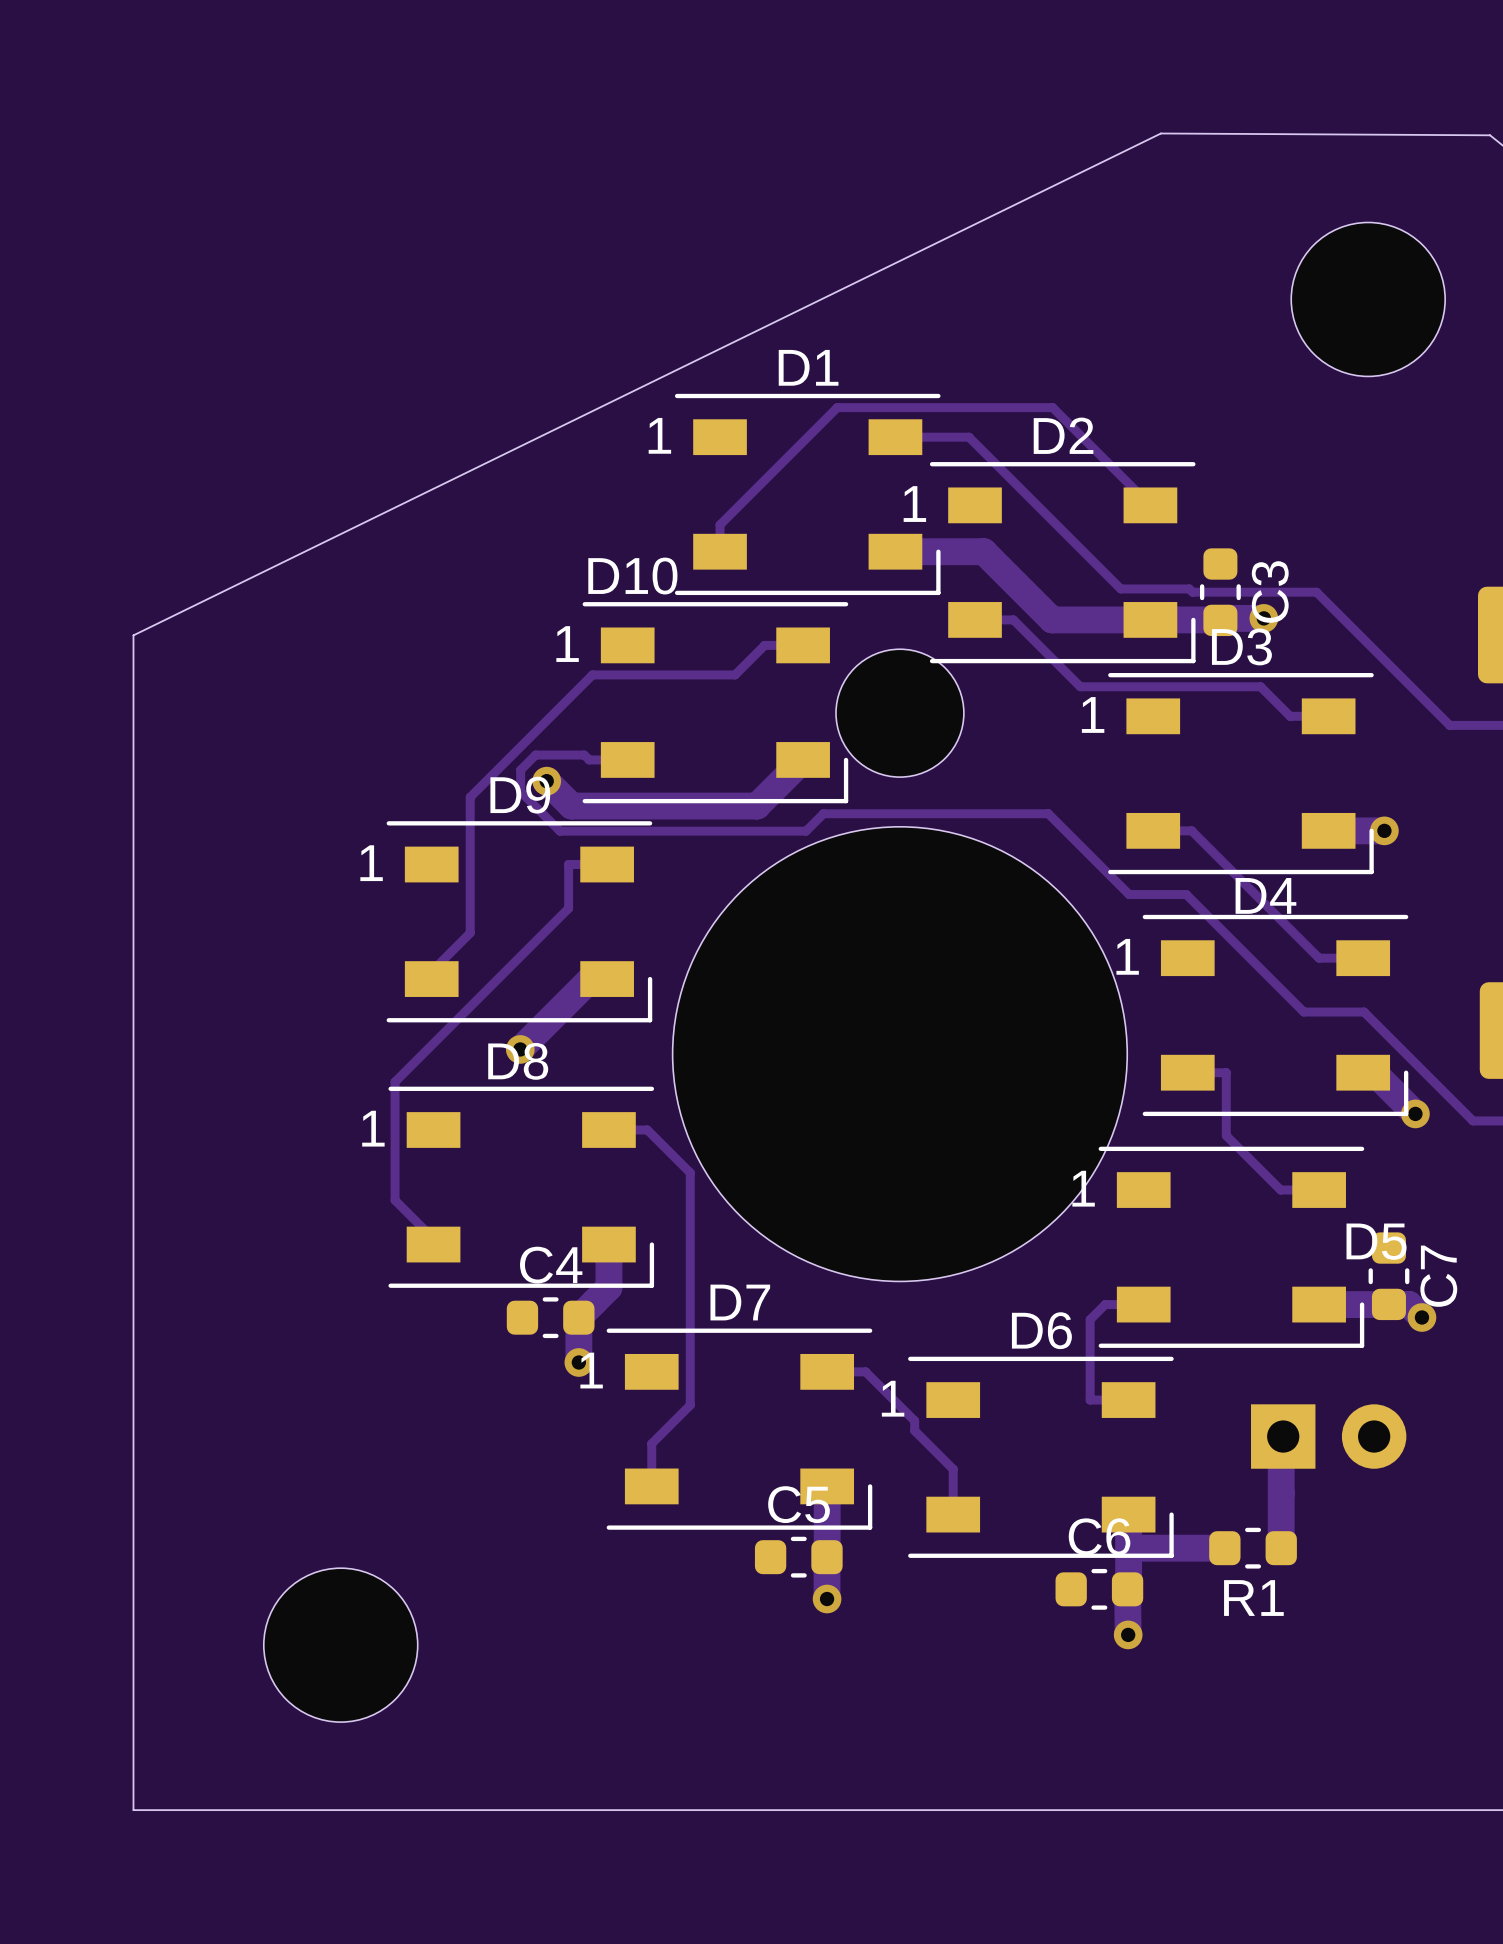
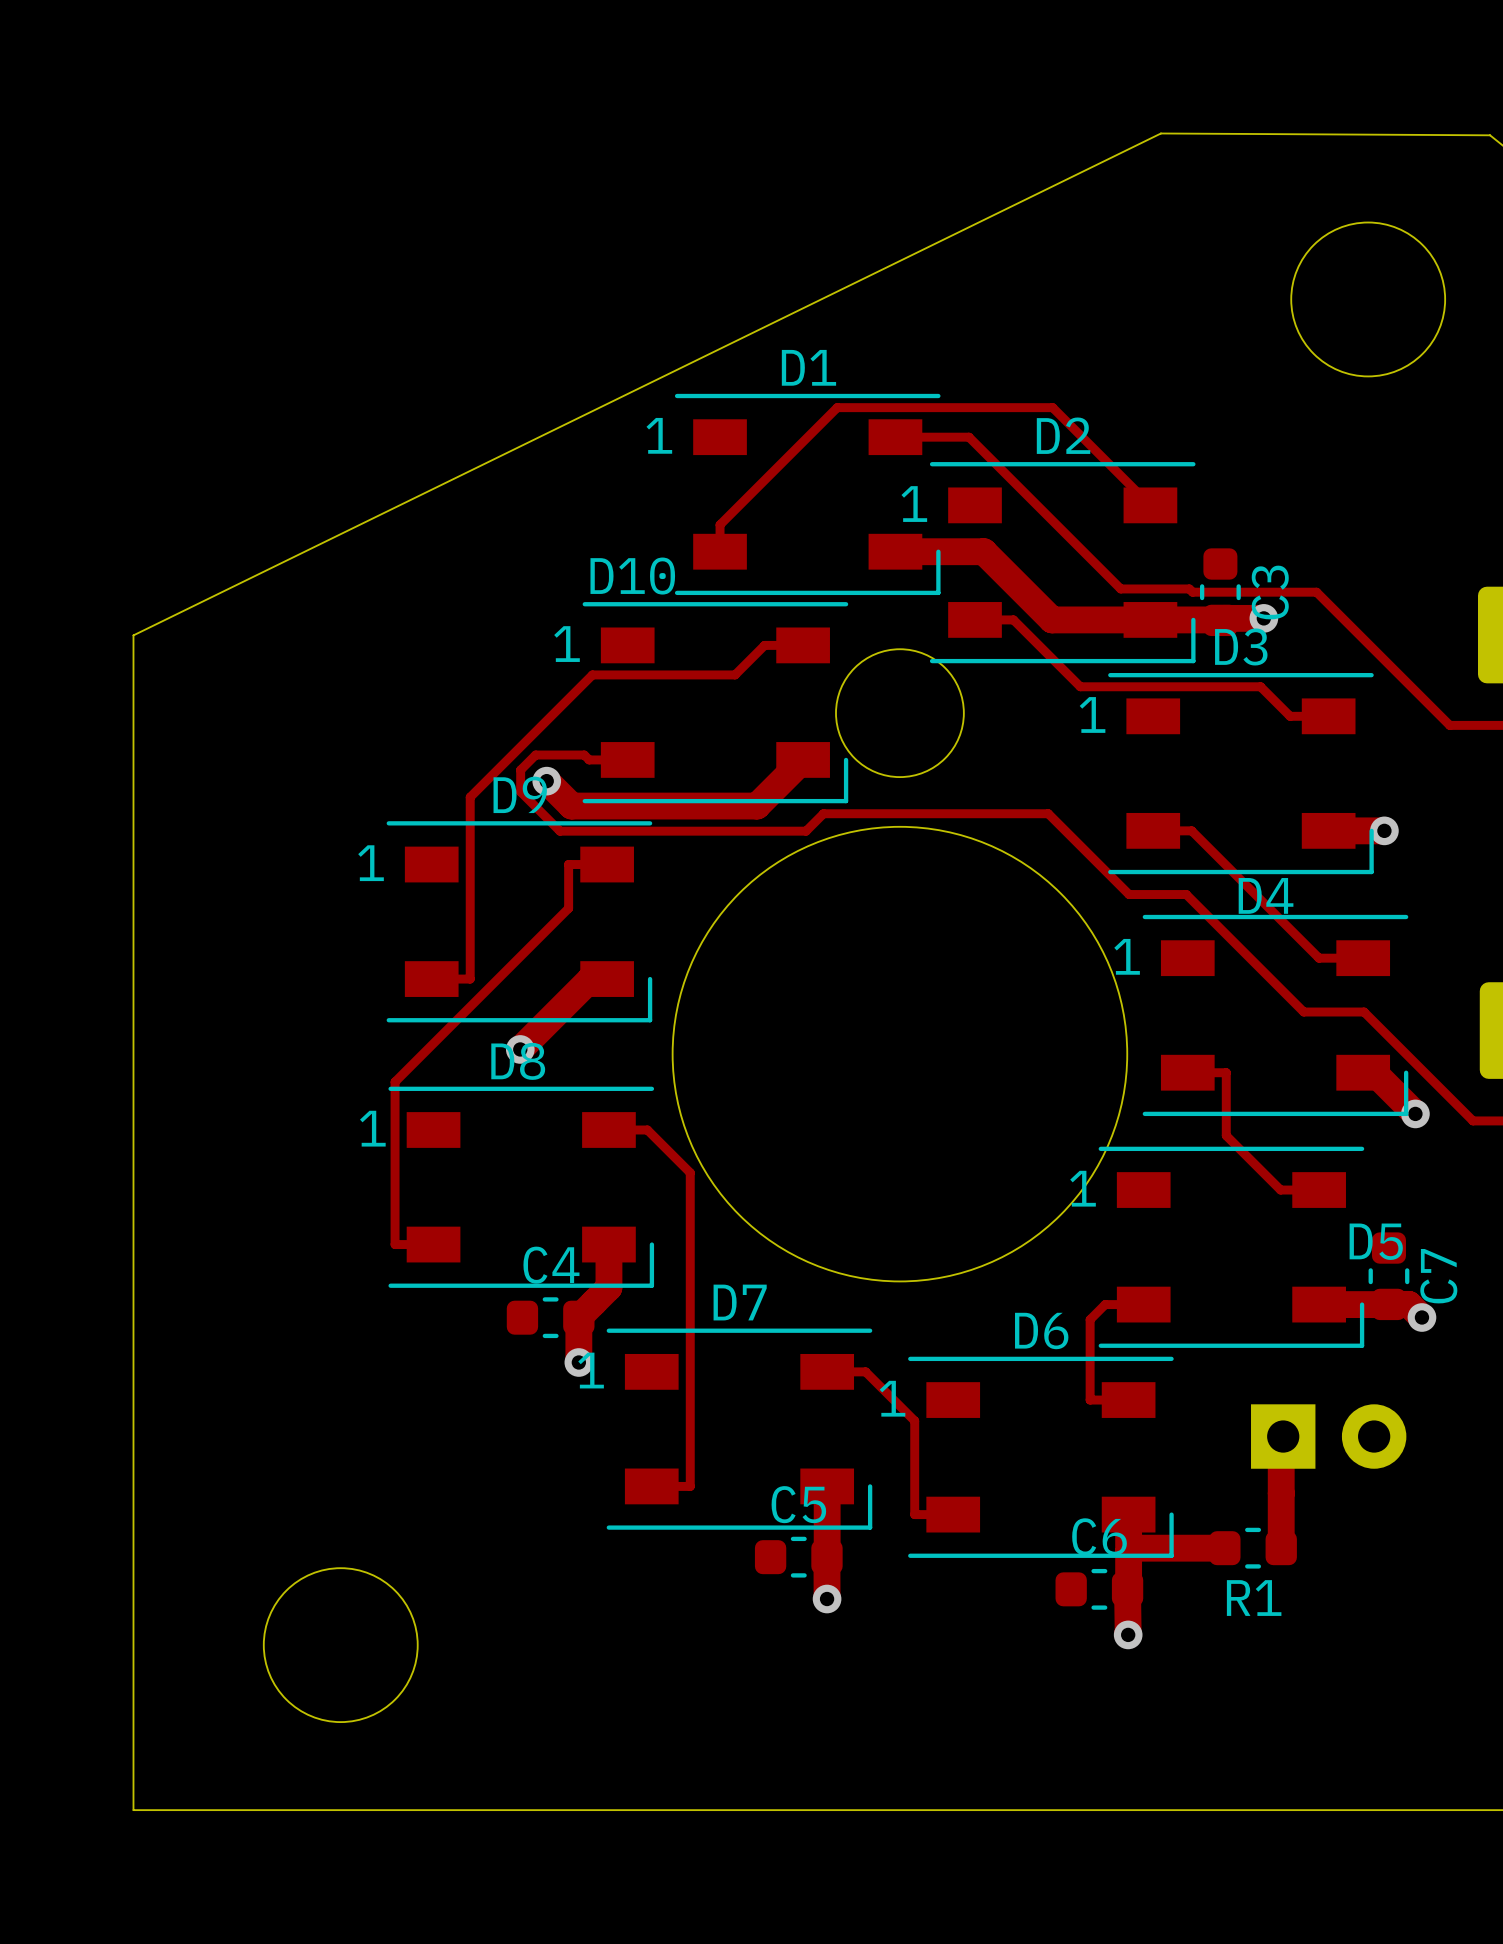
track: (470, 933) (431, 971) (431, 979) -> (470, 933) (470, 979) (431, 979)
track: (395, 1200) (433, 1238) (433, 1244) -> (395, 1200) (395, 1244) (433, 1244)
track: (690, 1405) (651, 1443) (651, 1486) -> (690, 1405) (690, 1486) (651, 1486)
track: (914, 1430) (953, 1469) (953, 1514) -> (914, 1430) (914, 1514) (953, 1514)

